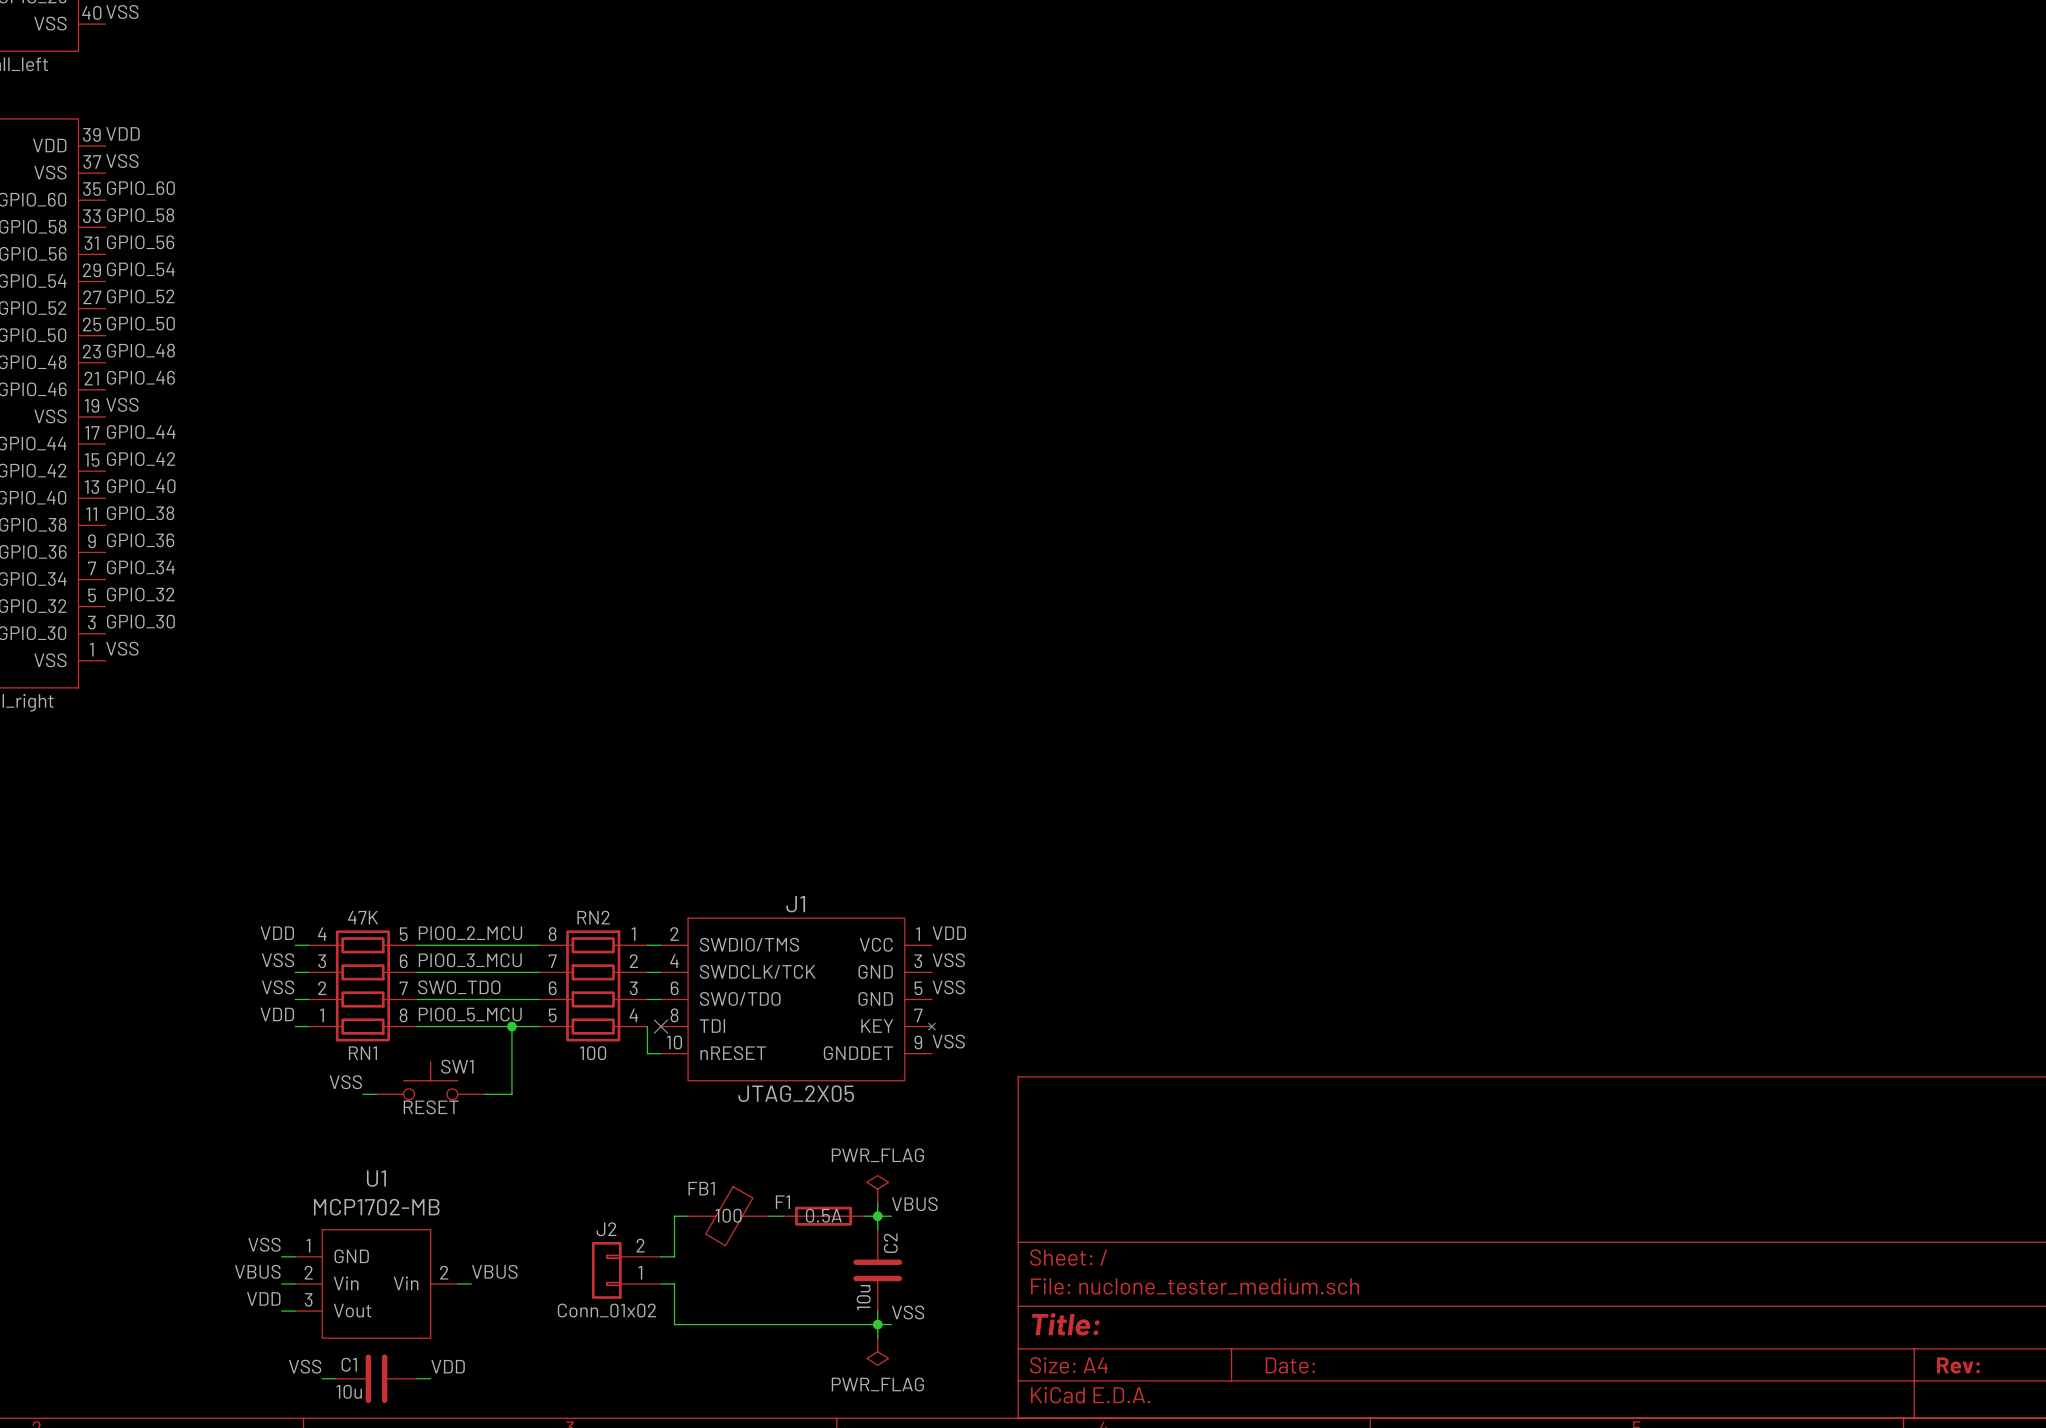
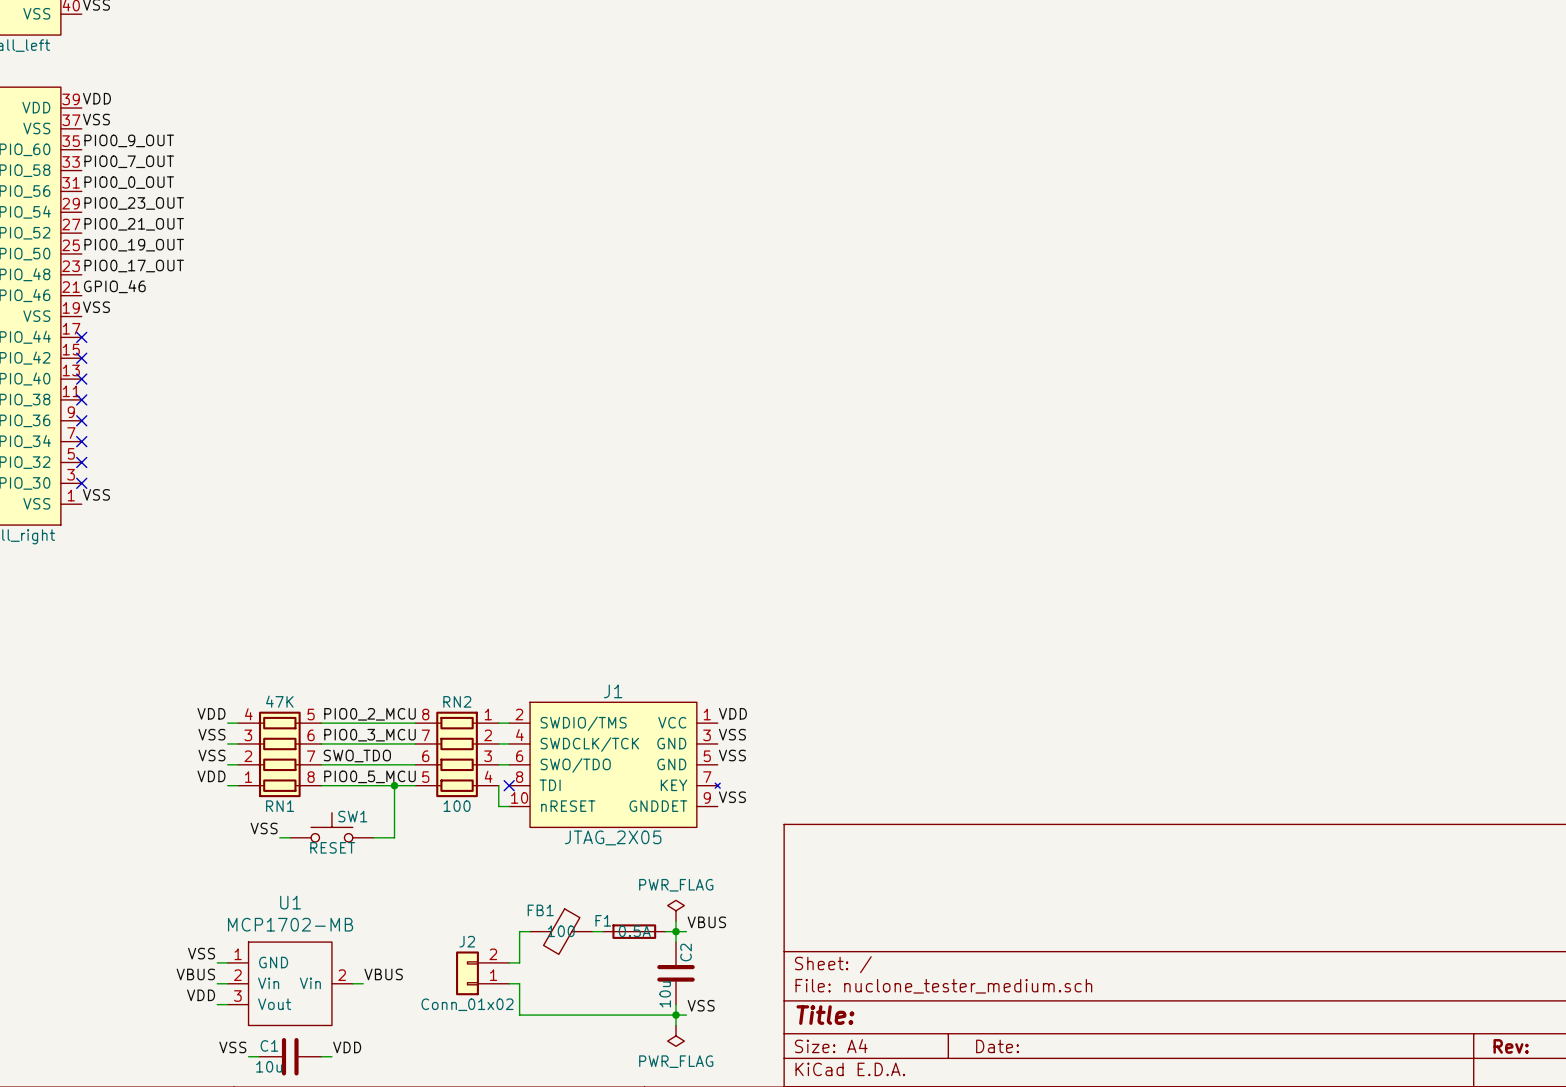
label: GPIO_60 (140, 188) -> PIO0_9_OUT (129, 140)
label: GPIO_58 (140, 215) -> PIO0_7_OUT (129, 161)
label: GPIO_56 (140, 242) -> PIO0_0_OUT (129, 182)
label: GPIO_54 (140, 269) -> PIO0_23_OUT (134, 203)
label: GPIO_52 (140, 296) -> PIO0_21_OUT (134, 224)
label: GPIO_50 (140, 323) -> PIO0_19_OUT (134, 245)
label: GPIO_48 (140, 350) -> PIO0_17_OUT (134, 266)
label: GPIO_44 (141, 431) -> none
no-connect mark: none -> (81, 337)
label: GPIO_42 (141, 459) -> none
no-connect mark: none -> (81, 358)
label: GPIO_40 (141, 486) -> none
no-connect mark: none -> (81, 379)
label: GPIO_38 (140, 513) -> none
no-connect mark: none -> (81, 399)
label: GPIO_36 (140, 540) -> none
no-connect mark: none -> (81, 420)
label: GPIO_34 (140, 567) -> none
no-connect mark: none -> (81, 441)
label: GPIO_32 (140, 594) -> none
no-connect mark: none -> (81, 462)
label: GPIO_30 (140, 621) -> none
no-connect mark: none -> (81, 483)

